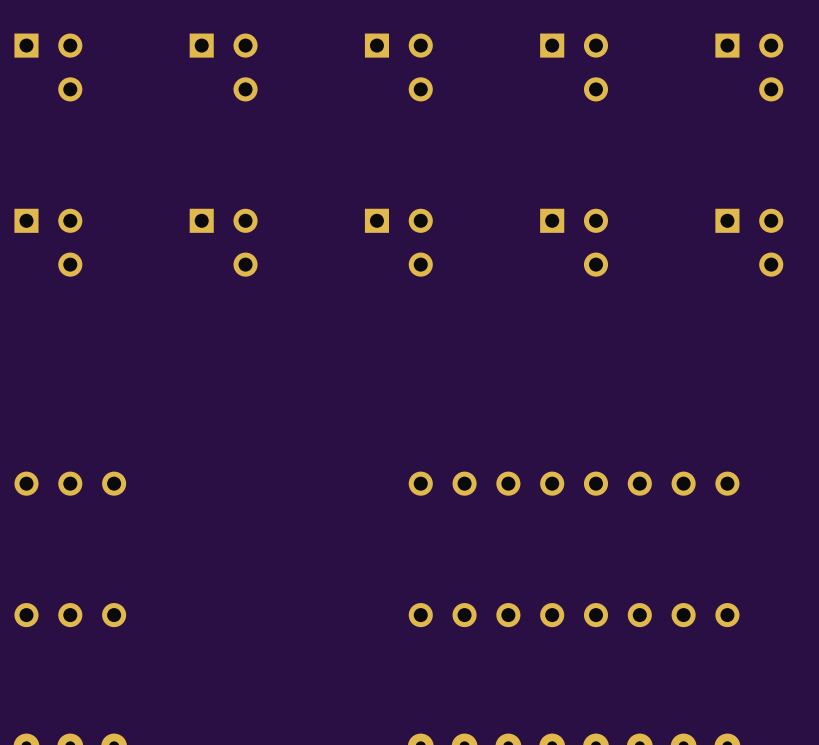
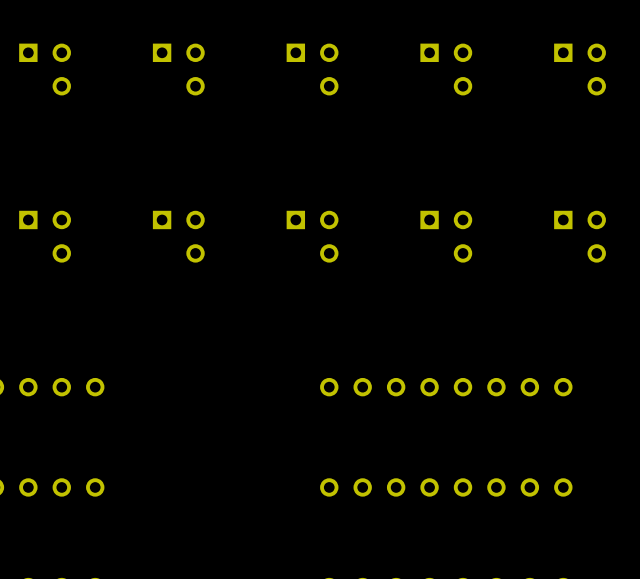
part position: (48, 242) -> (45, 236)
part position: (223, 242) -> (178, 236)
part position: (398, 242) -> (312, 236)
part position: (574, 242) -> (446, 236)
part position: (749, 242) -> (580, 236)

